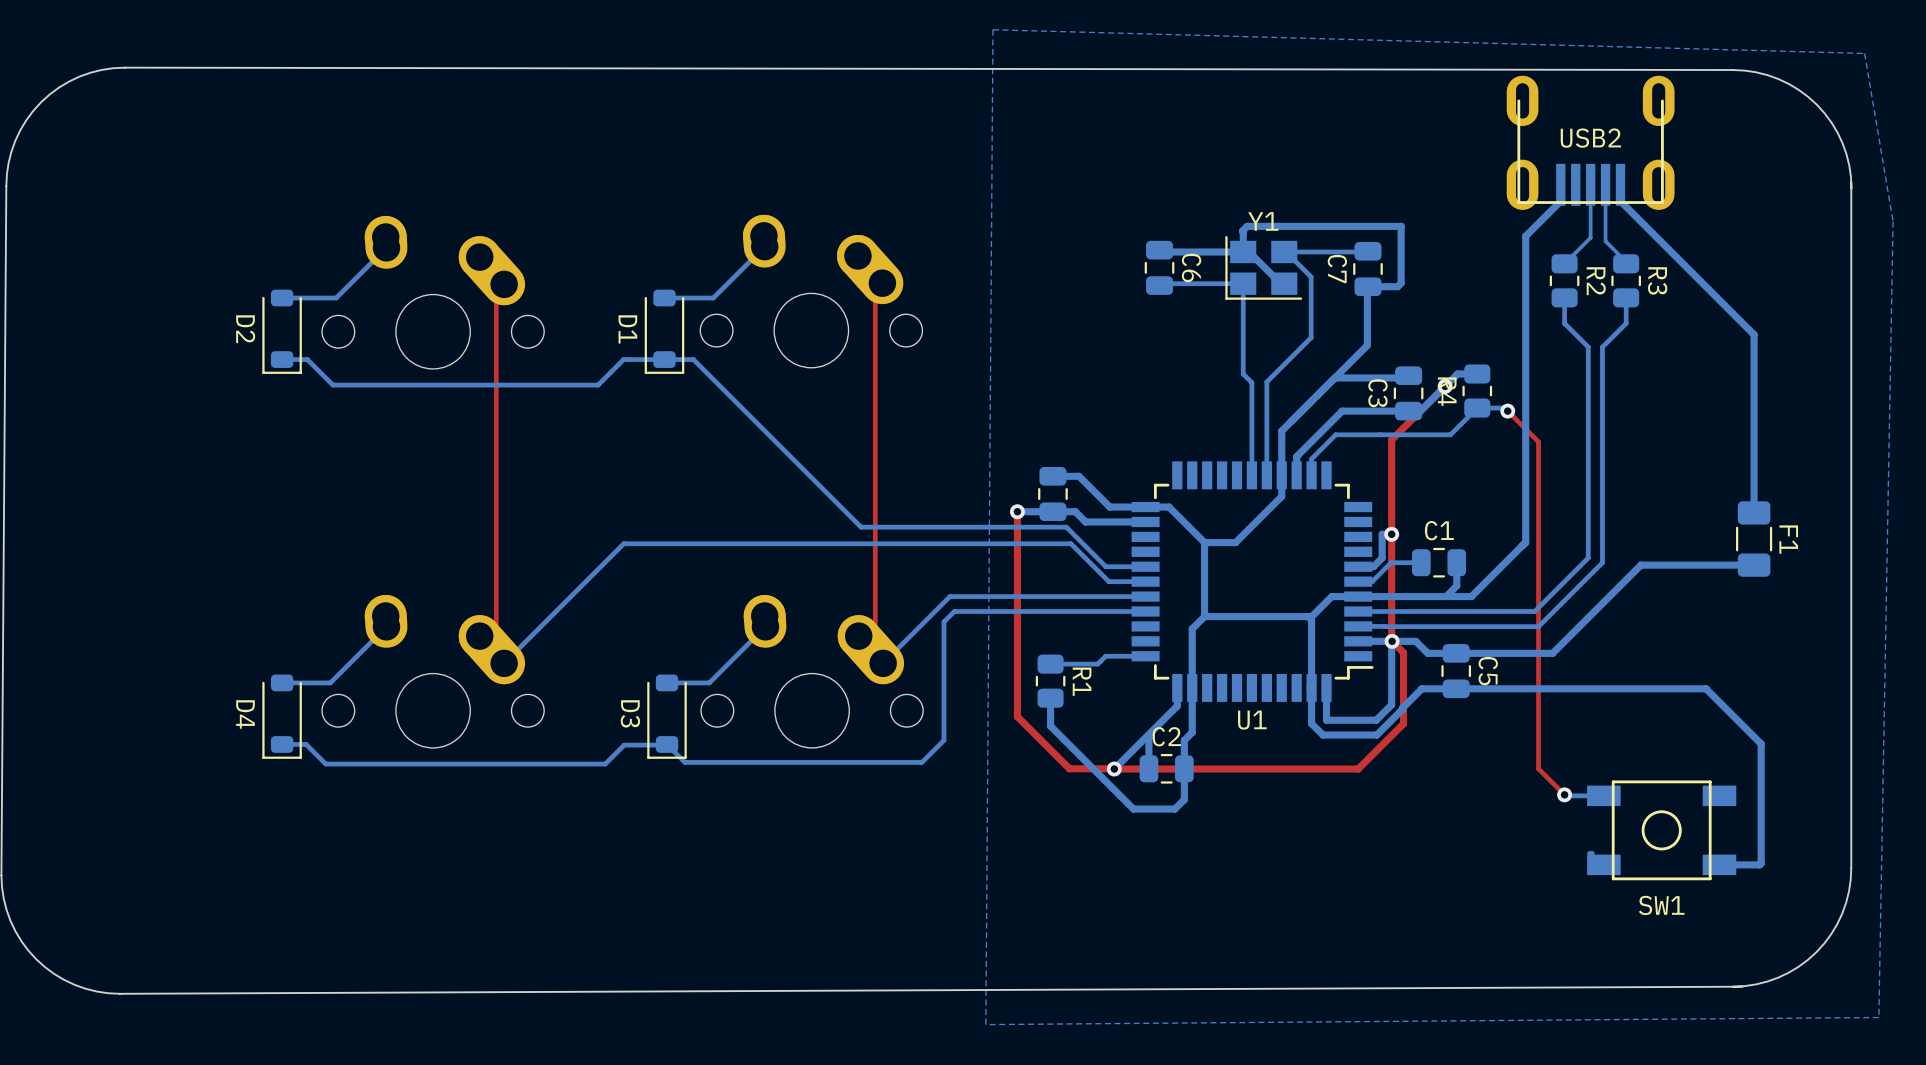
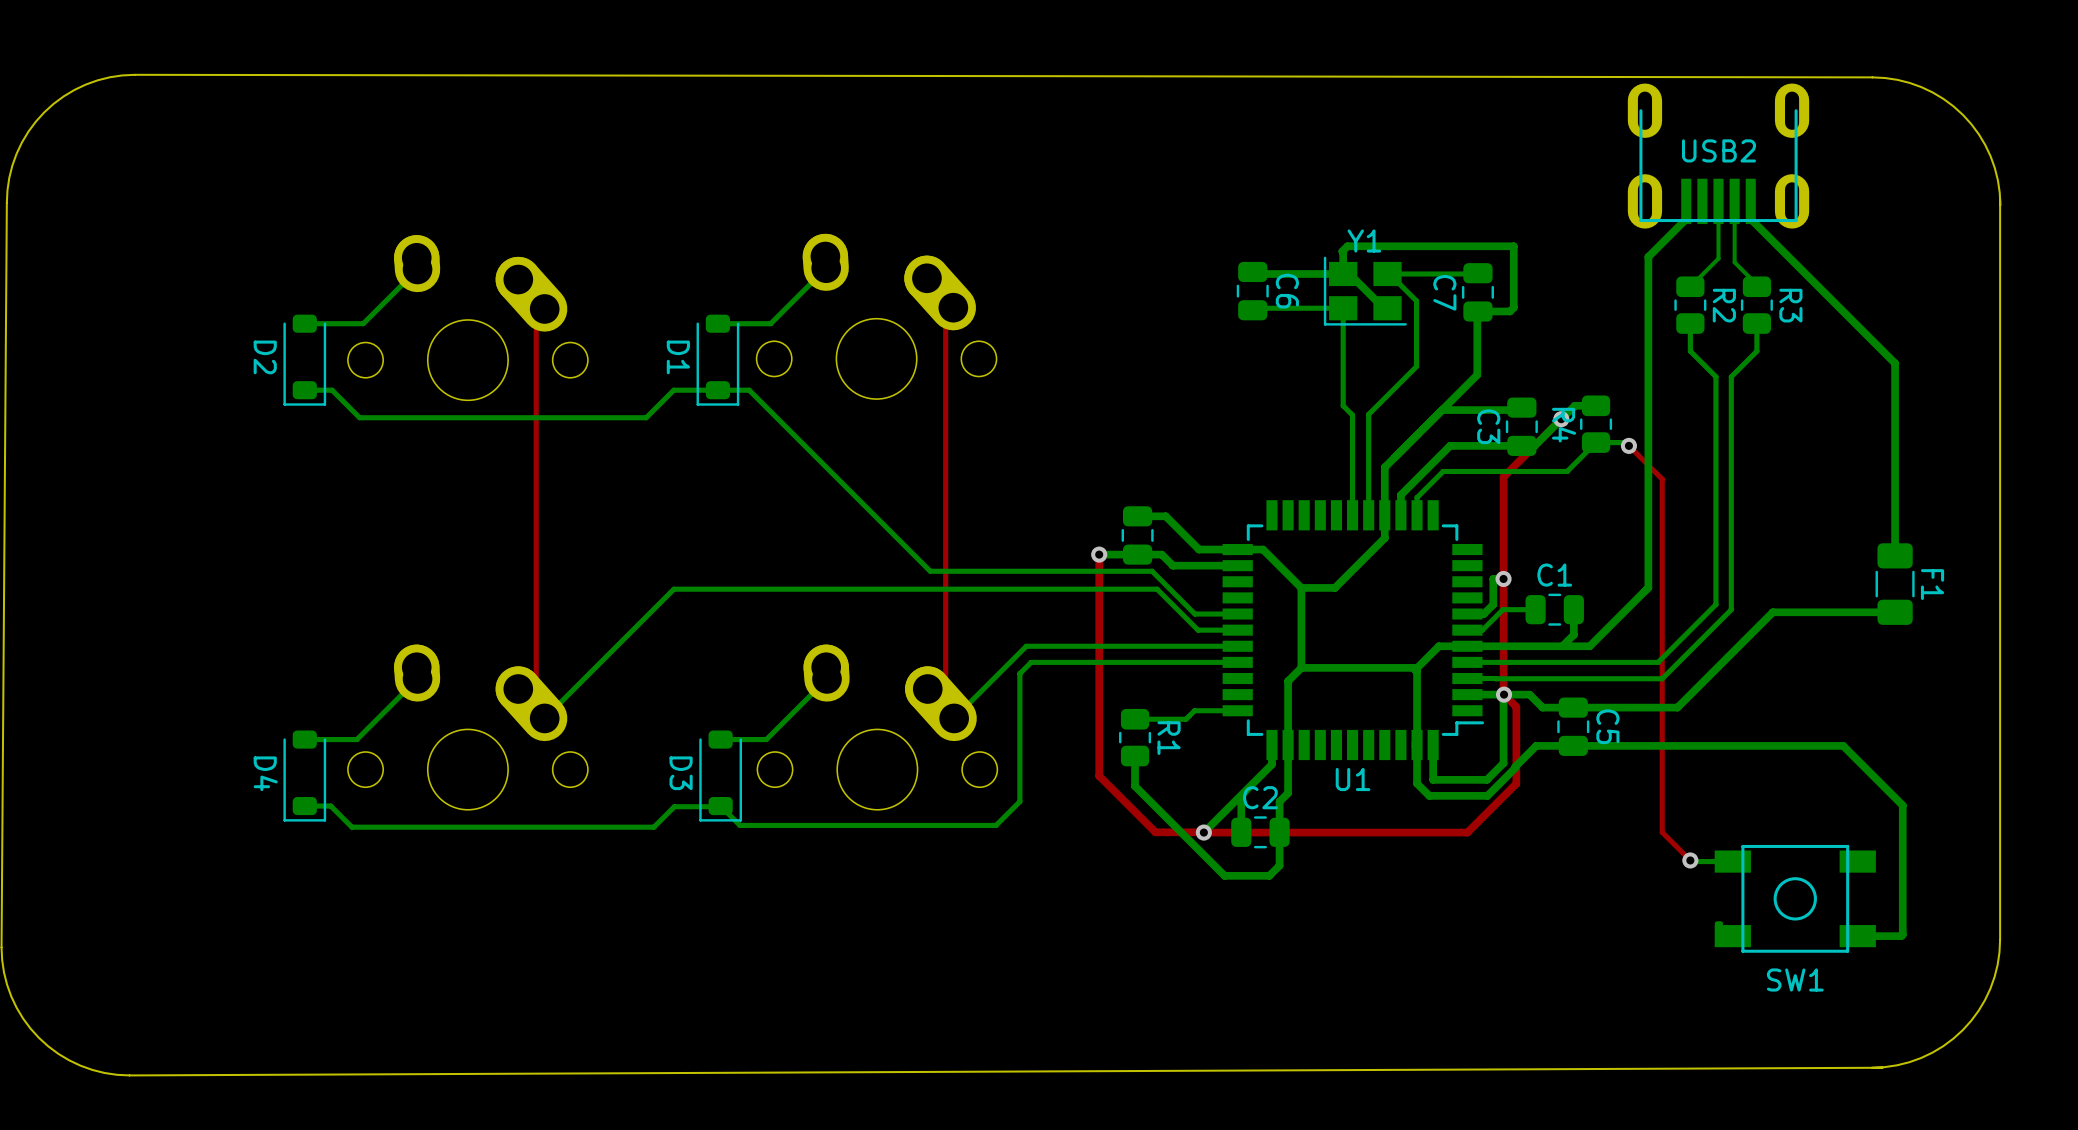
bottom zone outline: (992, 29) (985, 1024) (1878, 1017) (1893, 221) (1864, 53) (992, 29) -> none

